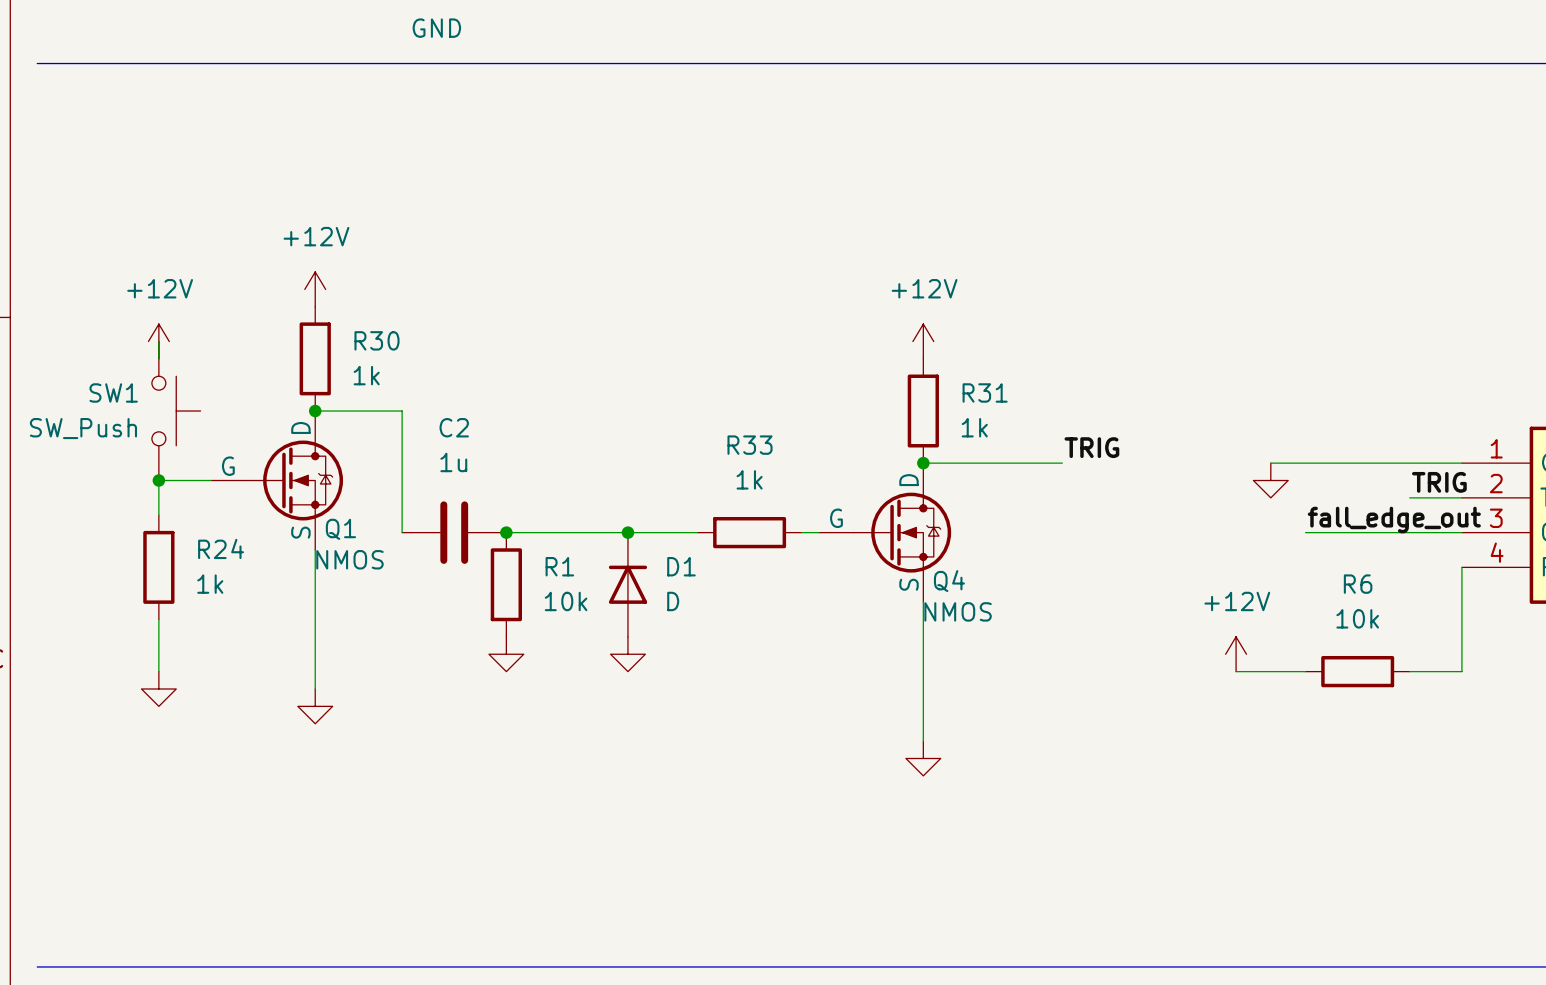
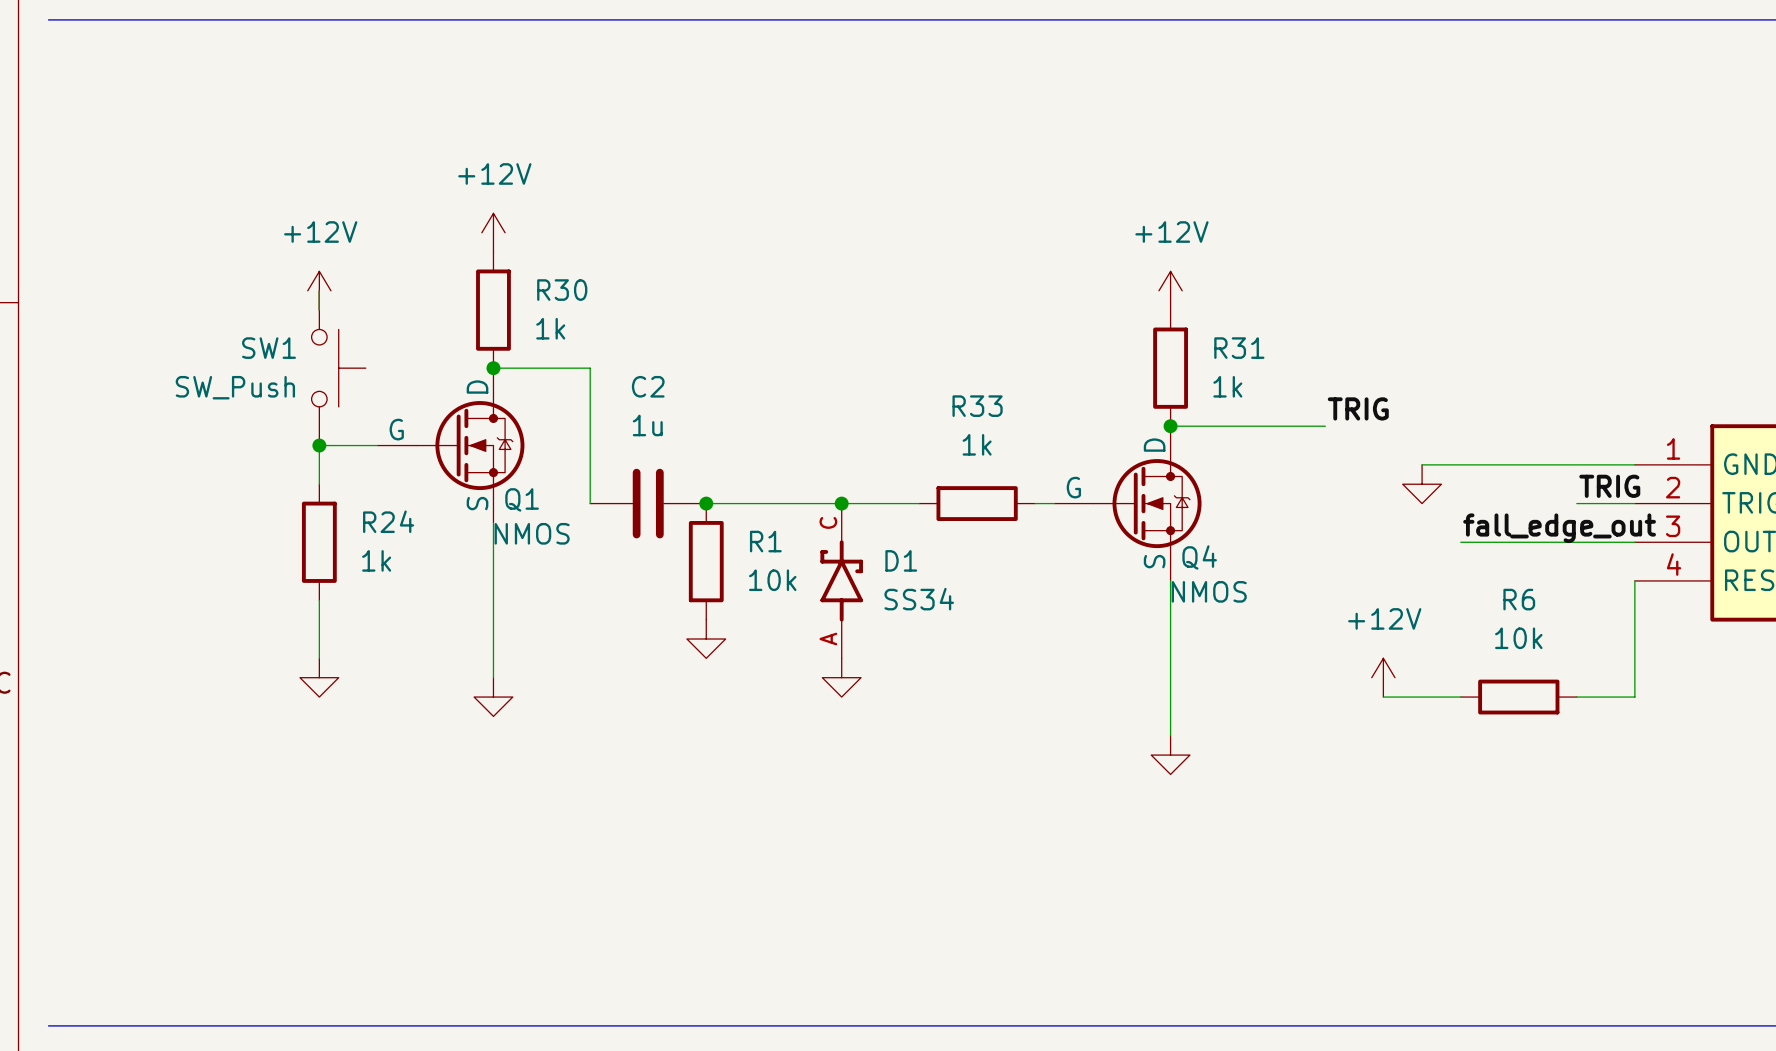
power symbol: none -> +12V (493, 232)
power symbol position: +12V (315, 289) -> +12V (319, 290)
wire: (158, 341) (158, 358) -> (319, 290) (319, 310)
power symbol: +12V (158, 341) -> none
power symbol position: +12V (923, 341) -> +12V (1170, 290)
R30 position: (315, 358) -> (493, 310)
junction: none -> (493, 368)
SW1 position: (176, 411) -> (338, 368)
wire: (315, 411) (402, 411) (402, 532) -> (493, 368) (590, 368) (590, 503)
junction position: (315, 411) -> (319, 445)
R31 position: (923, 411) -> (1170, 368)
junction: none -> (1170, 426)
label position: TRIG (1091, 447) -> TRIG (1358, 408)
wire: (923, 463) (1062, 463) -> (1170, 426) (1325, 426)
junction: (923, 463) -> none
junction: (158, 480) -> none
wire: (210, 480) (158, 480) (158, 515) -> (377, 445) (319, 445) (319, 484)
Q1 position: (277, 480) -> (450, 445)
junction: none -> (841, 503)
C2 position: (454, 532) -> (648, 503)
wire: (506, 532) (697, 532) -> (706, 503) (919, 503)
junction: (506, 532) -> none
D1 symbol: [608, 532, 648, 637] -> [820, 503, 863, 659]
junction position: (627, 532) -> (706, 503)
R33 position: (749, 532) -> (977, 503)
wire: (801, 532) (819, 532) -> (1035, 503) (1054, 503)
Q4 position: (885, 532) -> (1128, 503)
wire: (315, 550) (315, 688) -> (493, 522) (493, 677)
R24 position: (158, 567) -> (319, 542)
R1 position: (506, 584) -> (706, 561)
D1 value: D (673, 601) -> SS34 (919, 599)
wire: (923, 602) (923, 741) -> (1170, 580) (1170, 735)
wire: (158, 619) (158, 671) -> (319, 600) (319, 658)
power symbol: (506, 654) -> none
power symbol position: (627, 654) -> (706, 639)
power symbol: none -> (841, 677)
power symbol: none -> (493, 697)
power symbol: (158, 688) -> none
power symbol position: (315, 706) -> (319, 677)
power symbol: none -> (1170, 755)
power symbol: (923, 758) -> none

